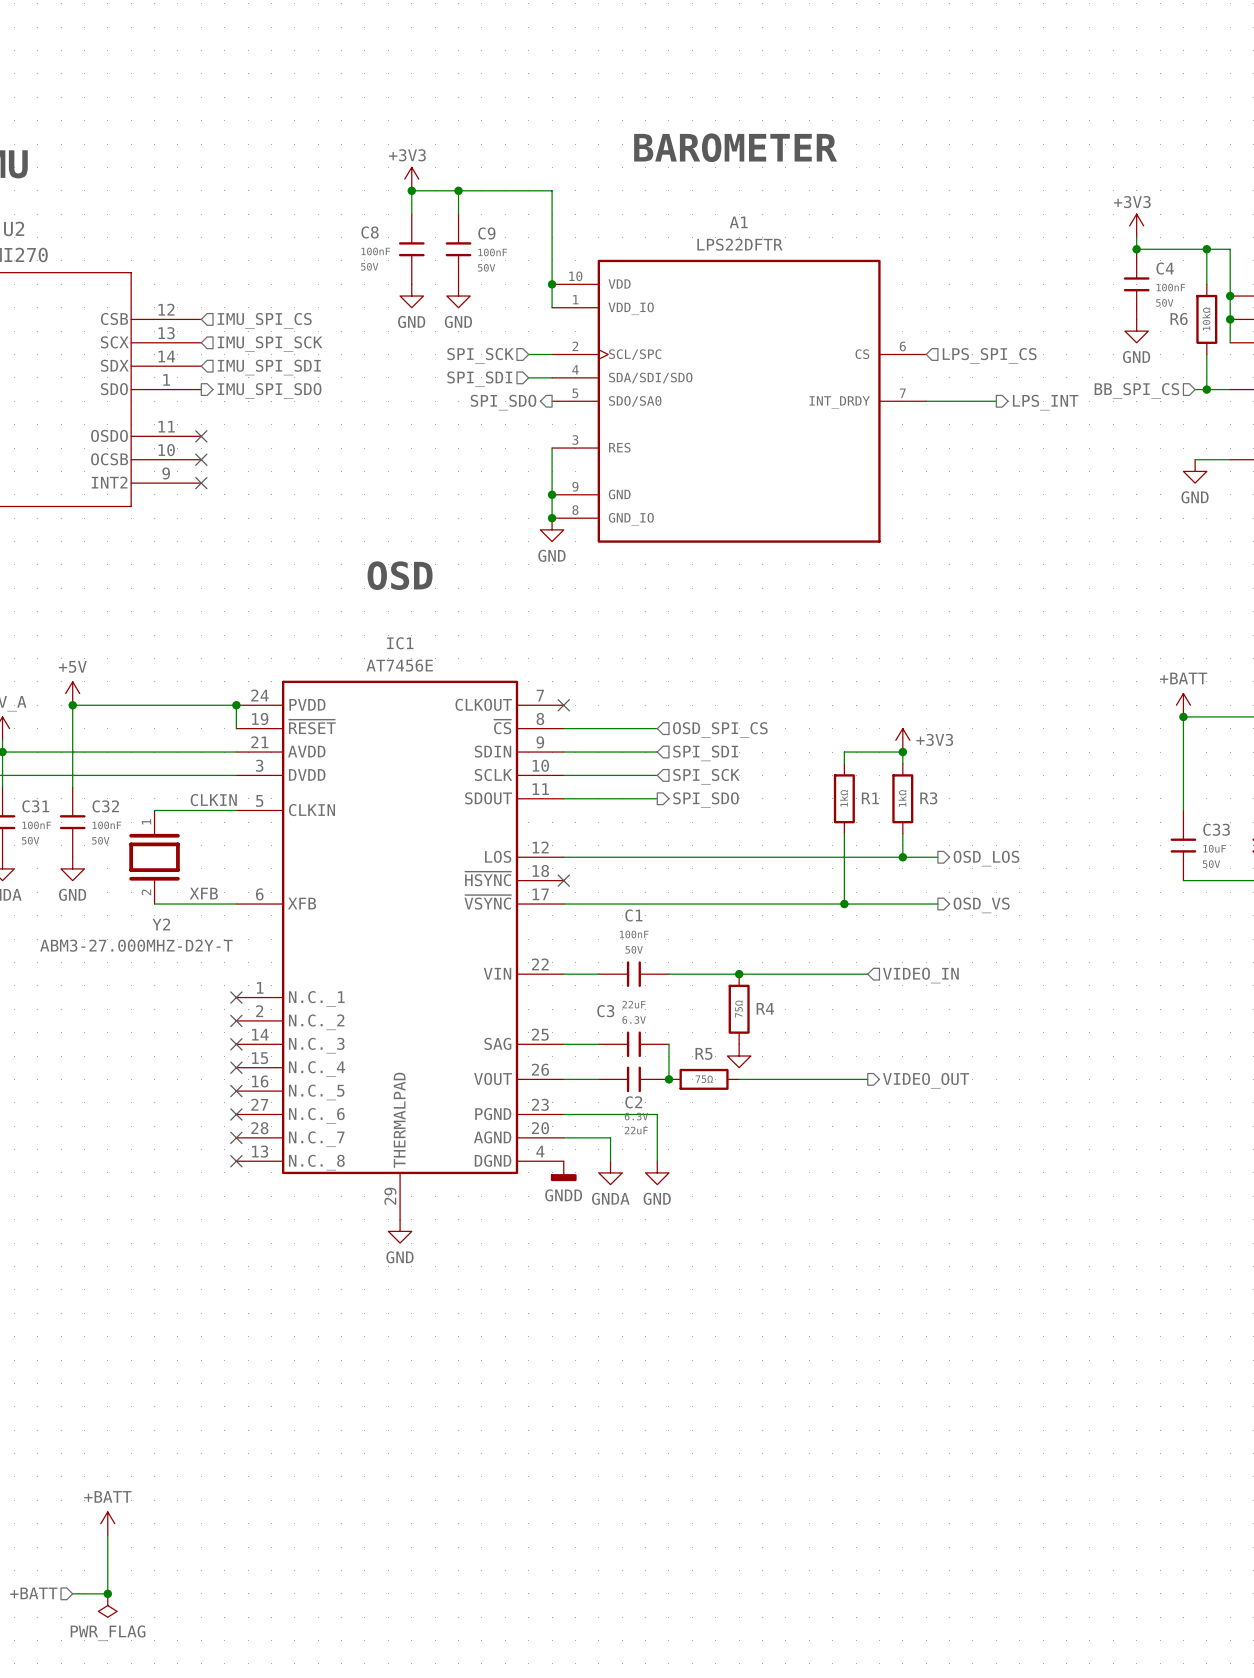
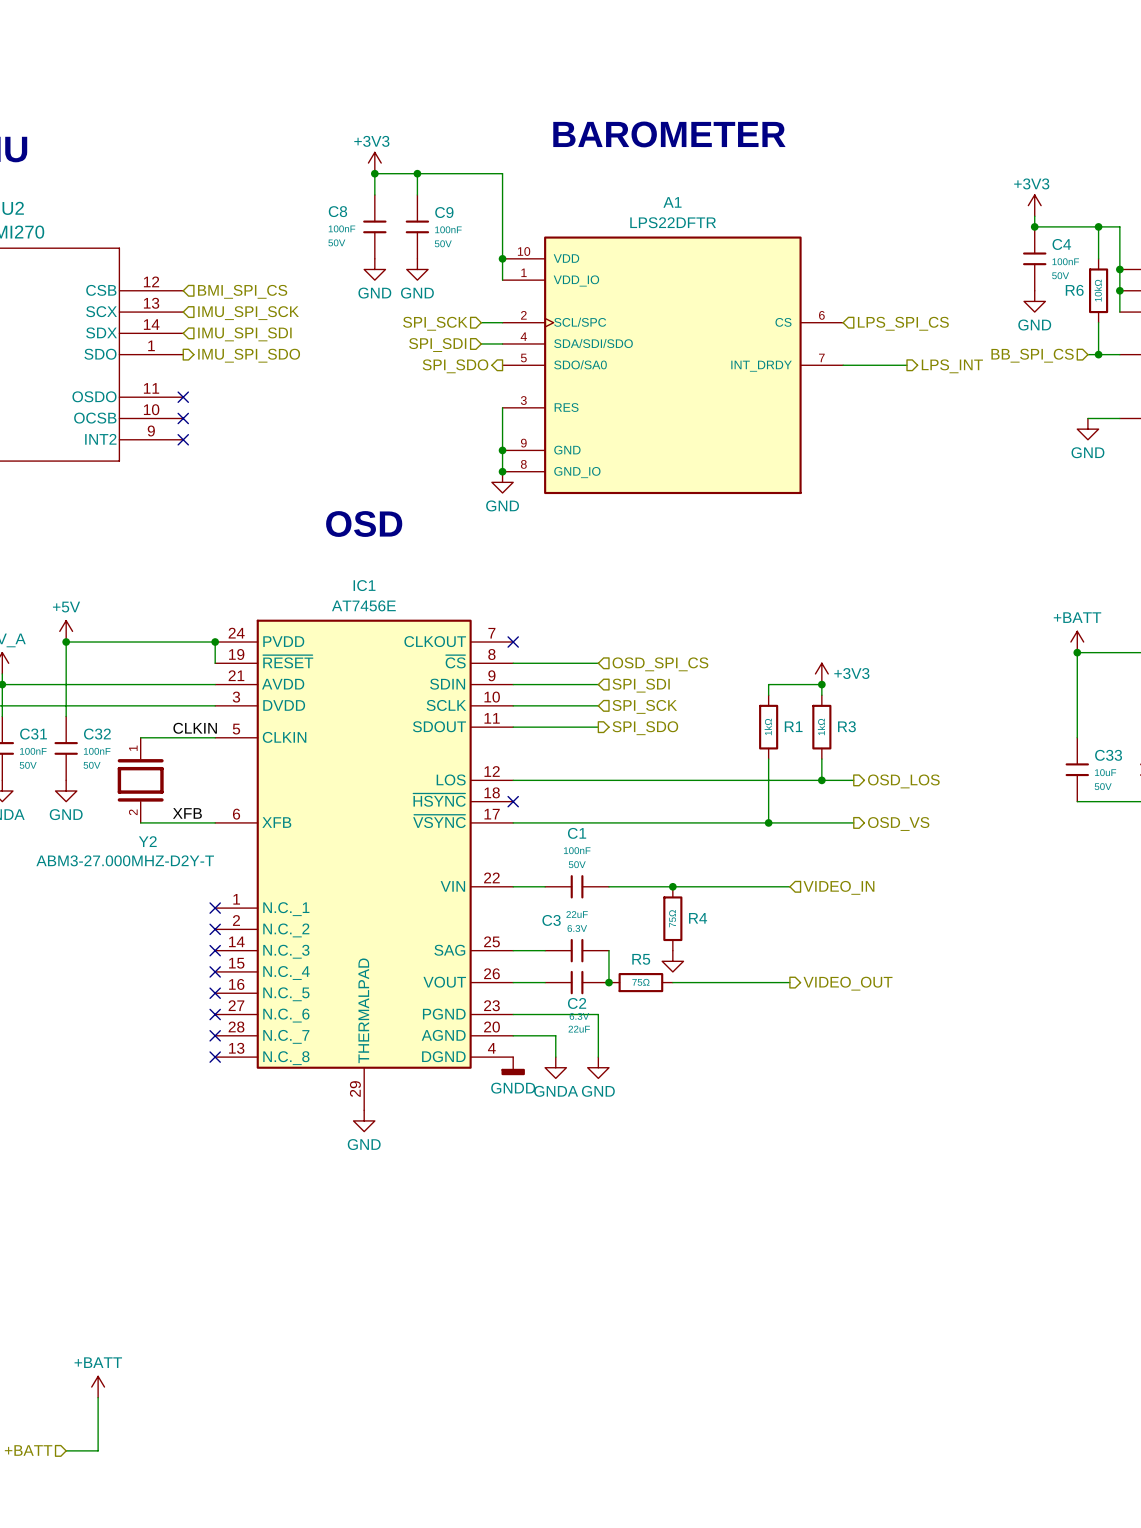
hierarchical label: IMU_SPI_CS (264, 320) -> BMI_SPI_CS (242, 291)
junction: (107, 1593) -> none
power symbol: PWR_FLAG (107, 1605) -> none

